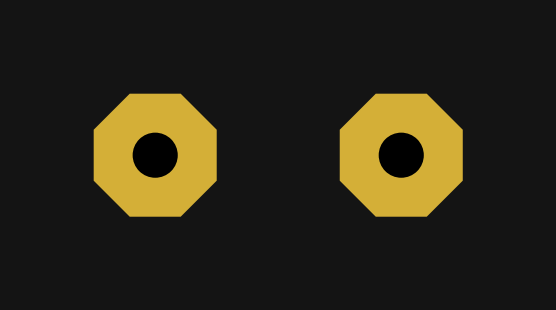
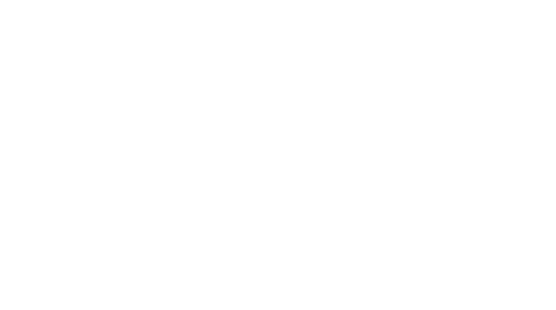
part: (155, 155) -> none
part: (401, 155) -> none

